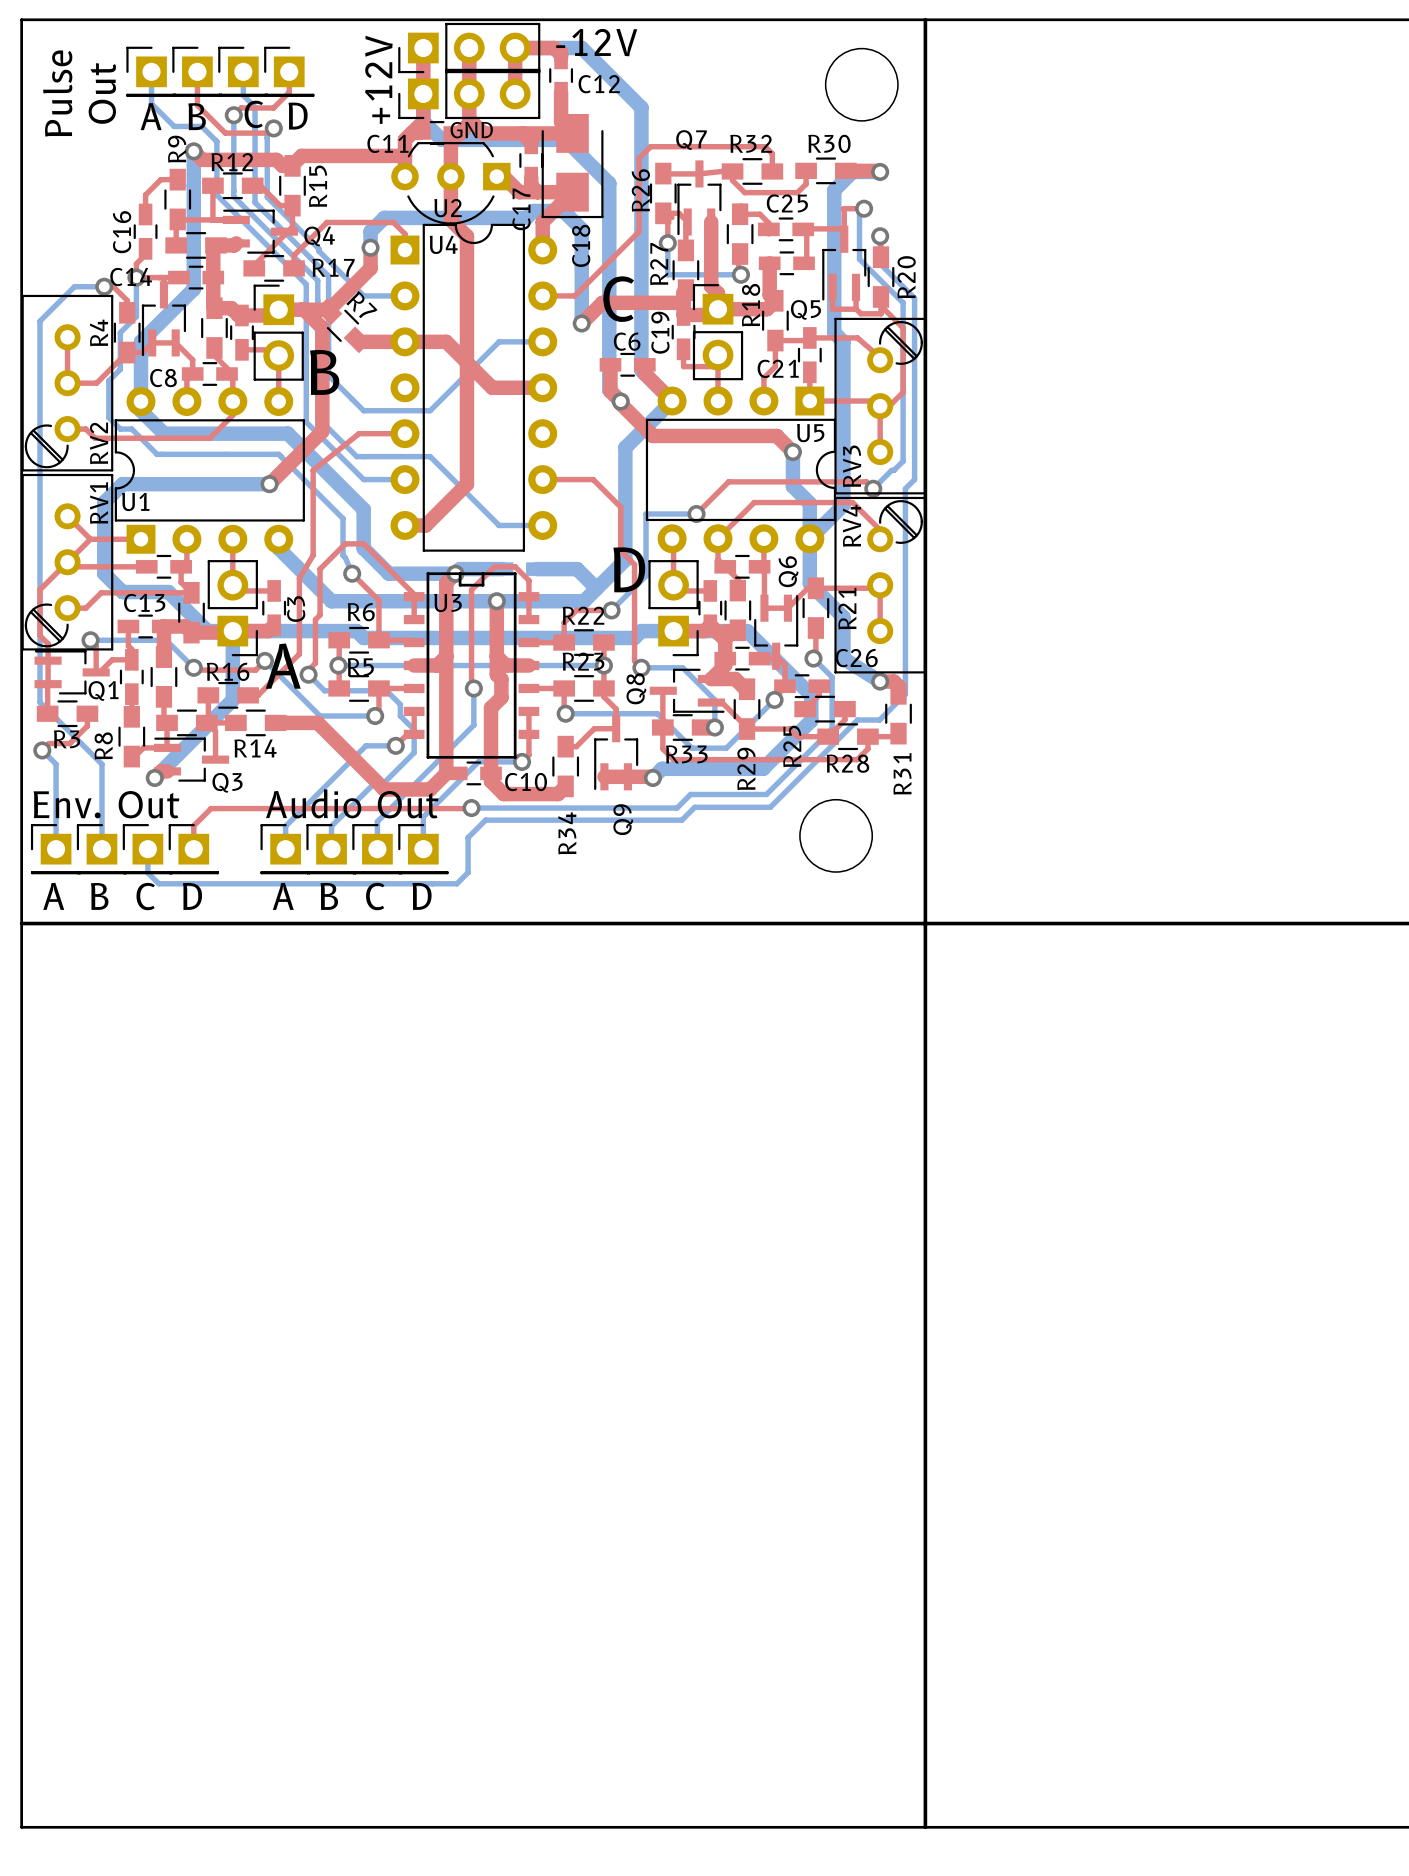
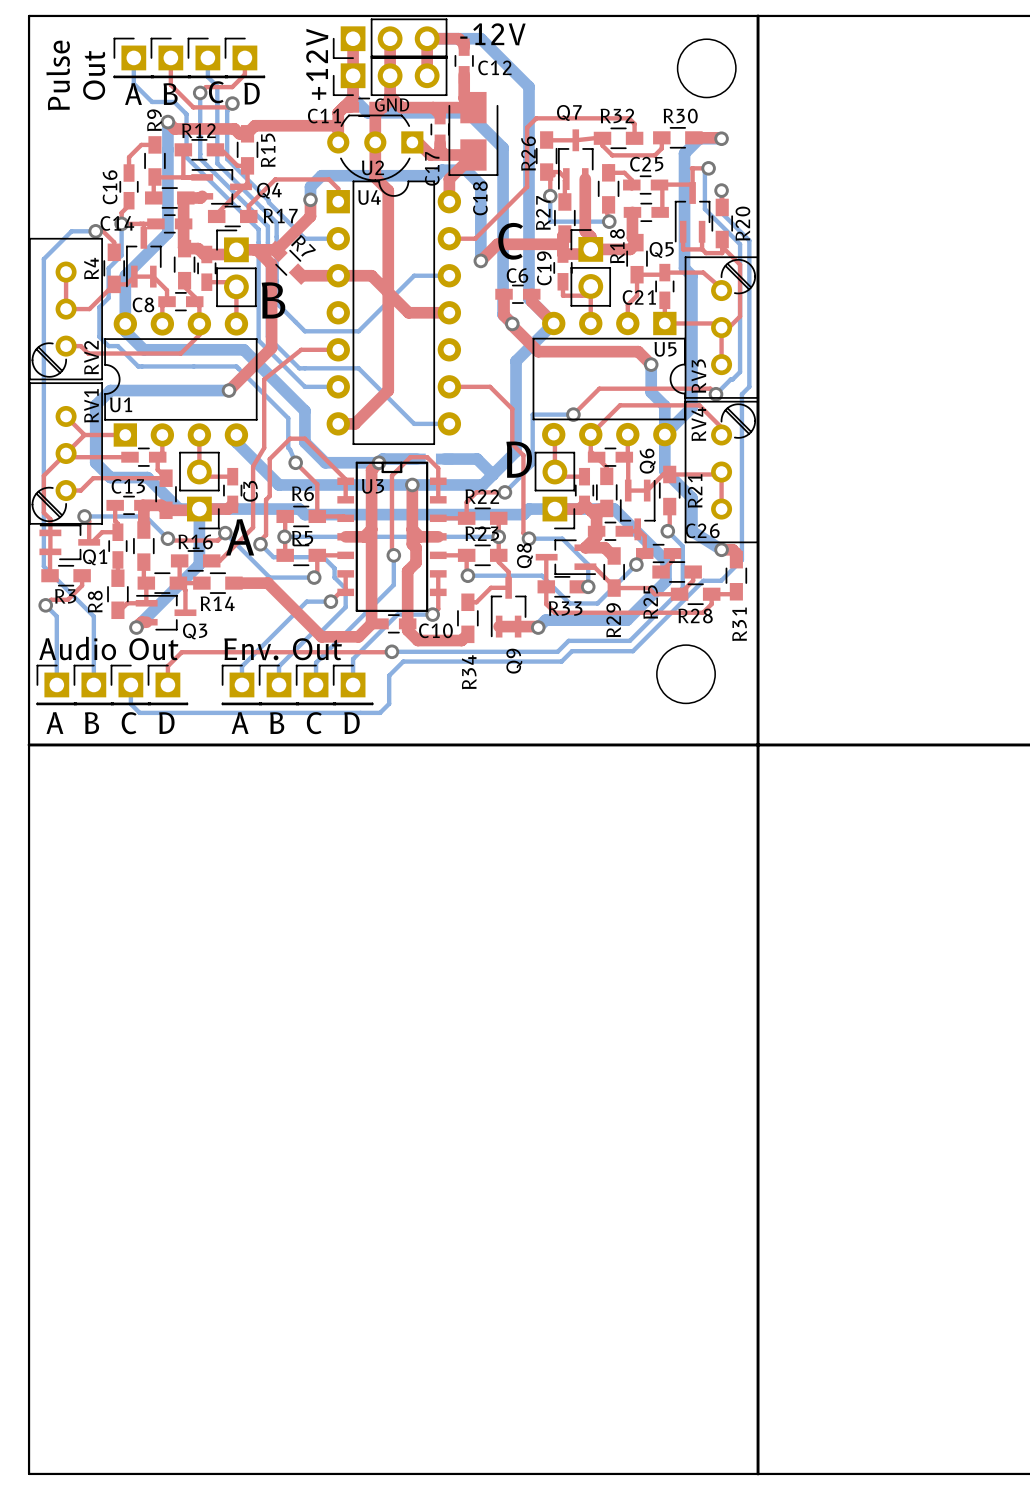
text position: Audio Out (352, 803) -> Audio Out (108, 648)
text position: Env. Out (106, 804) -> Env. Out (283, 649)

